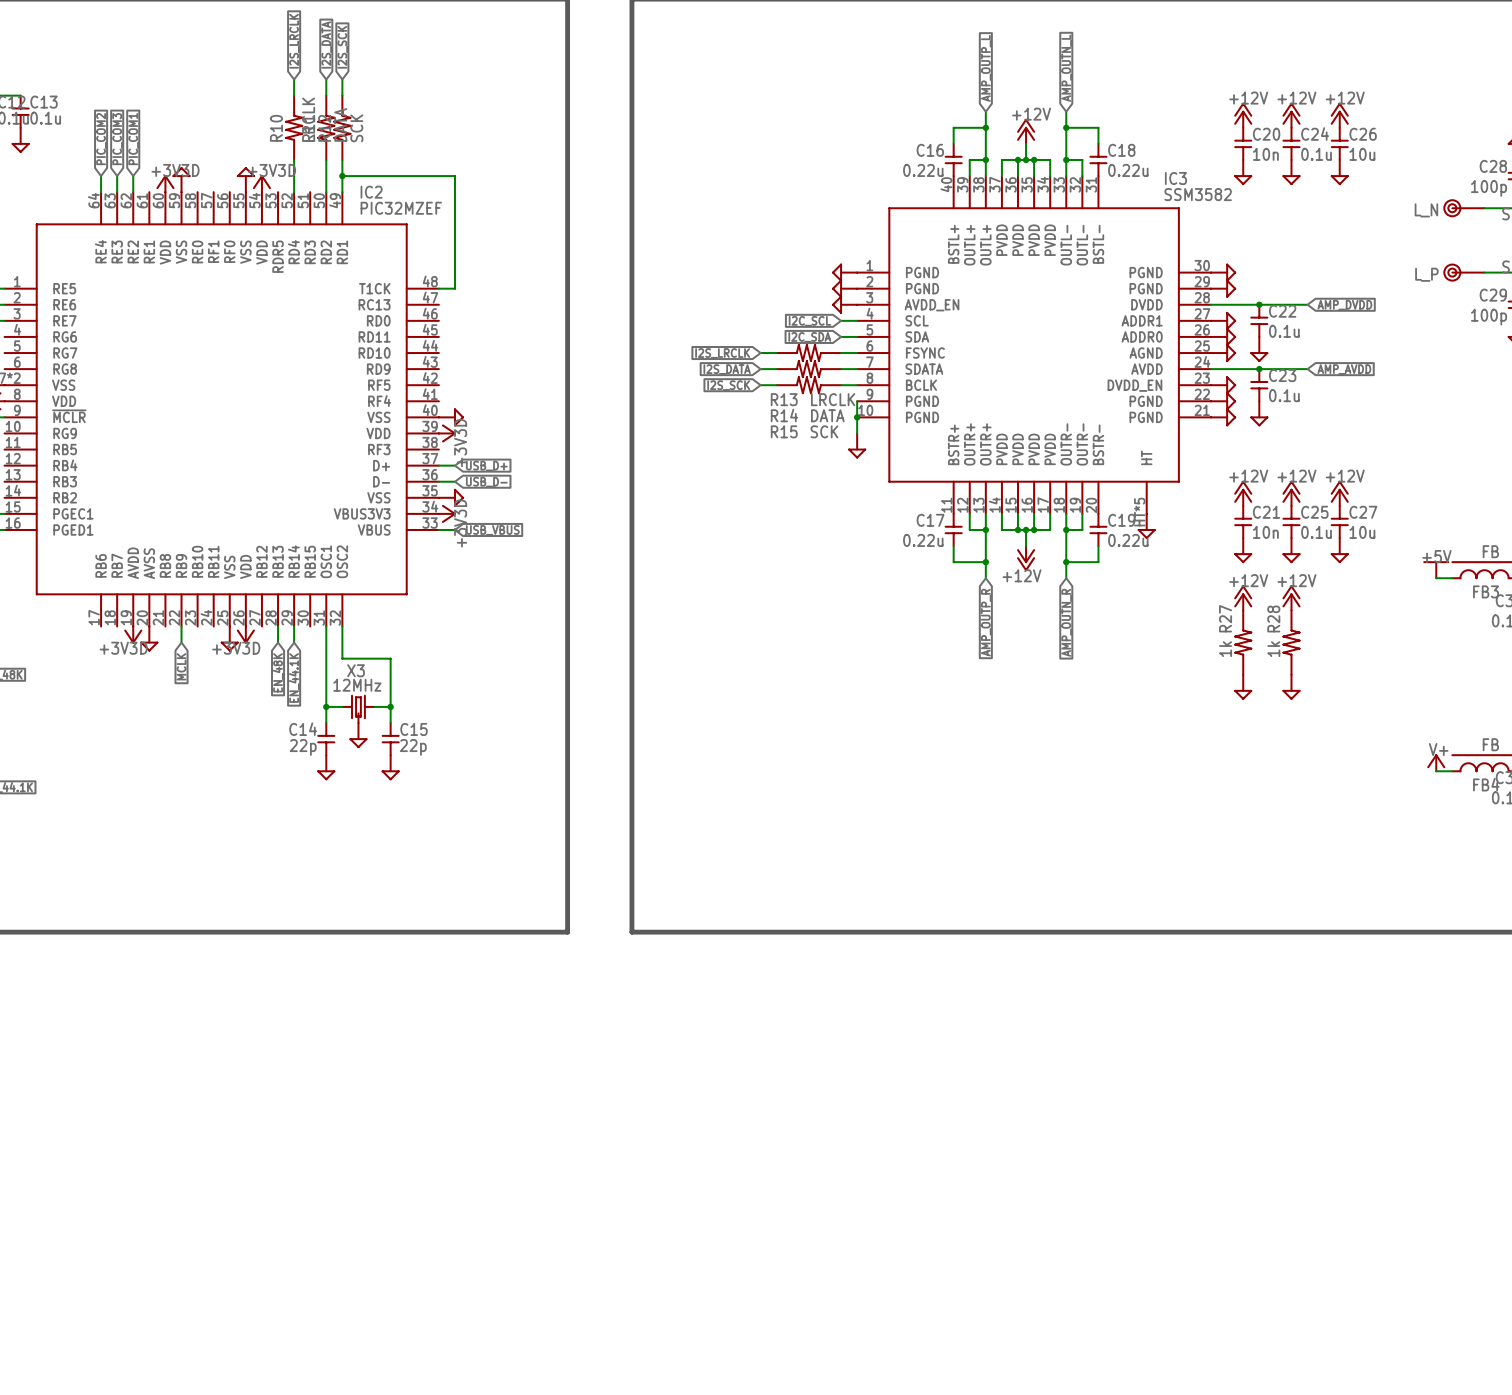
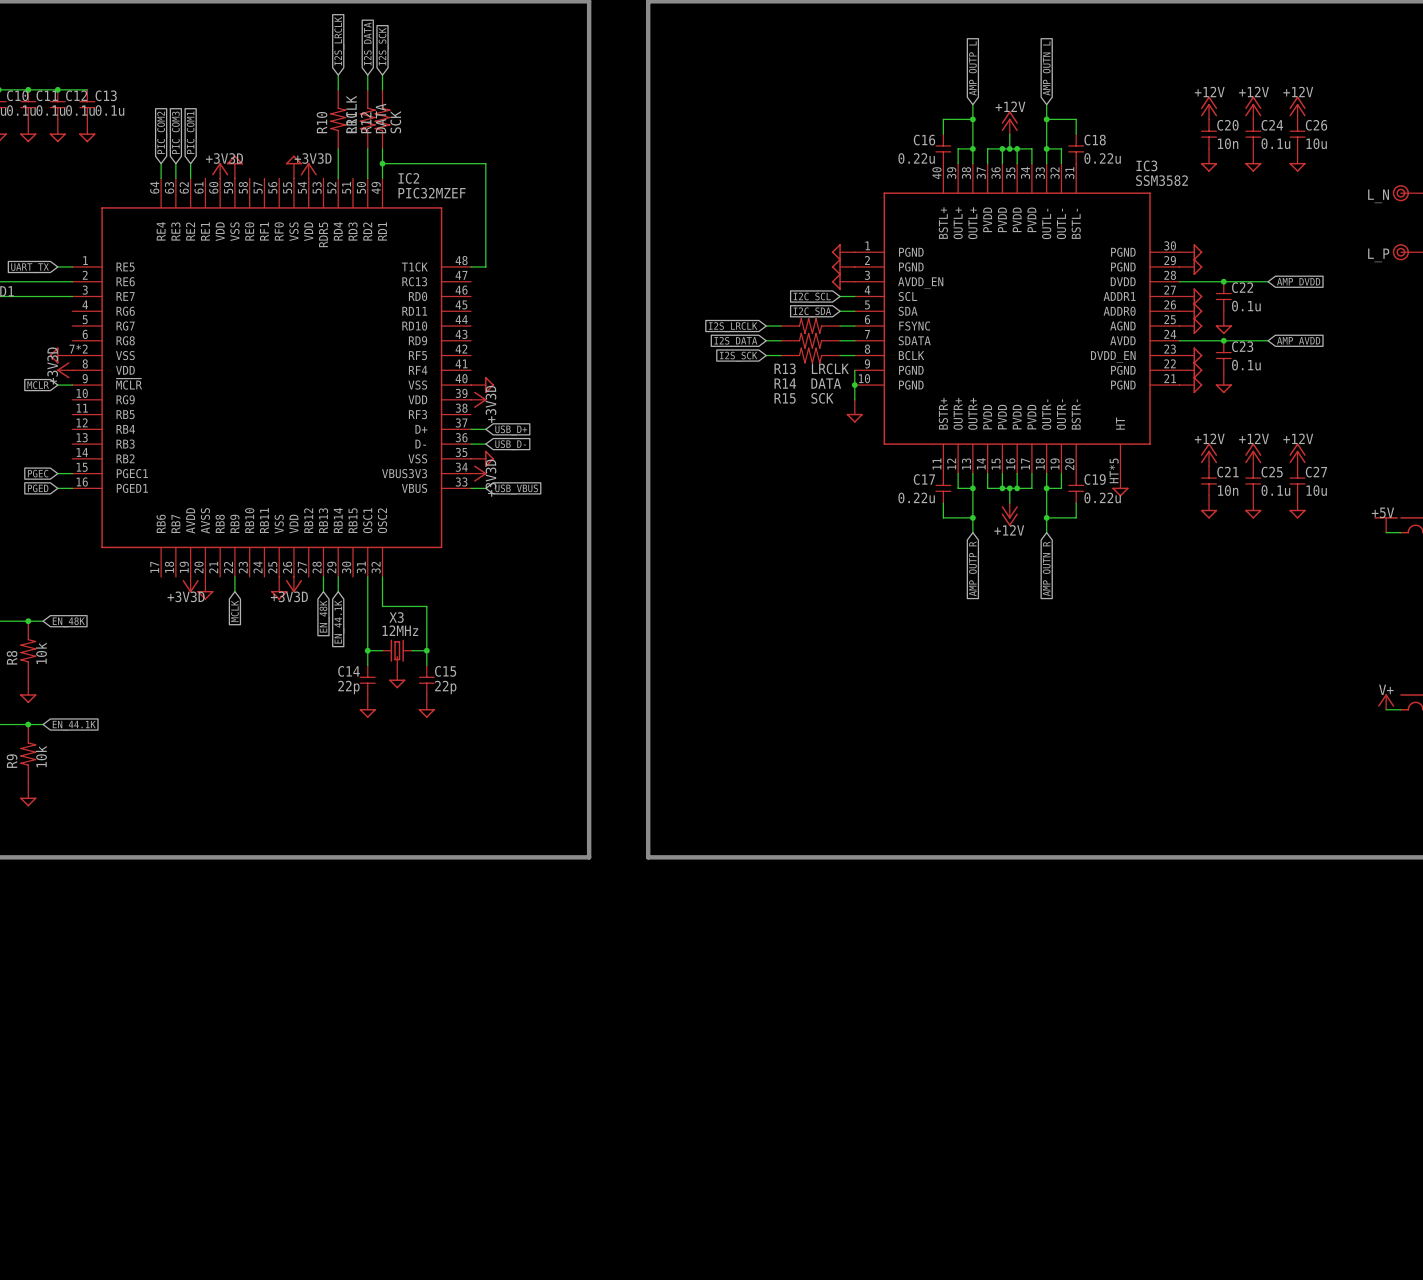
power symbol: +12V (1243, 597) -> none
power symbol: +12V (1291, 597) -> none
R27: 1k (1243, 642) -> none
R28: 1k (1291, 642) -> none
power symbol: (1243, 687) -> none
power symbol: (1291, 687) -> none

